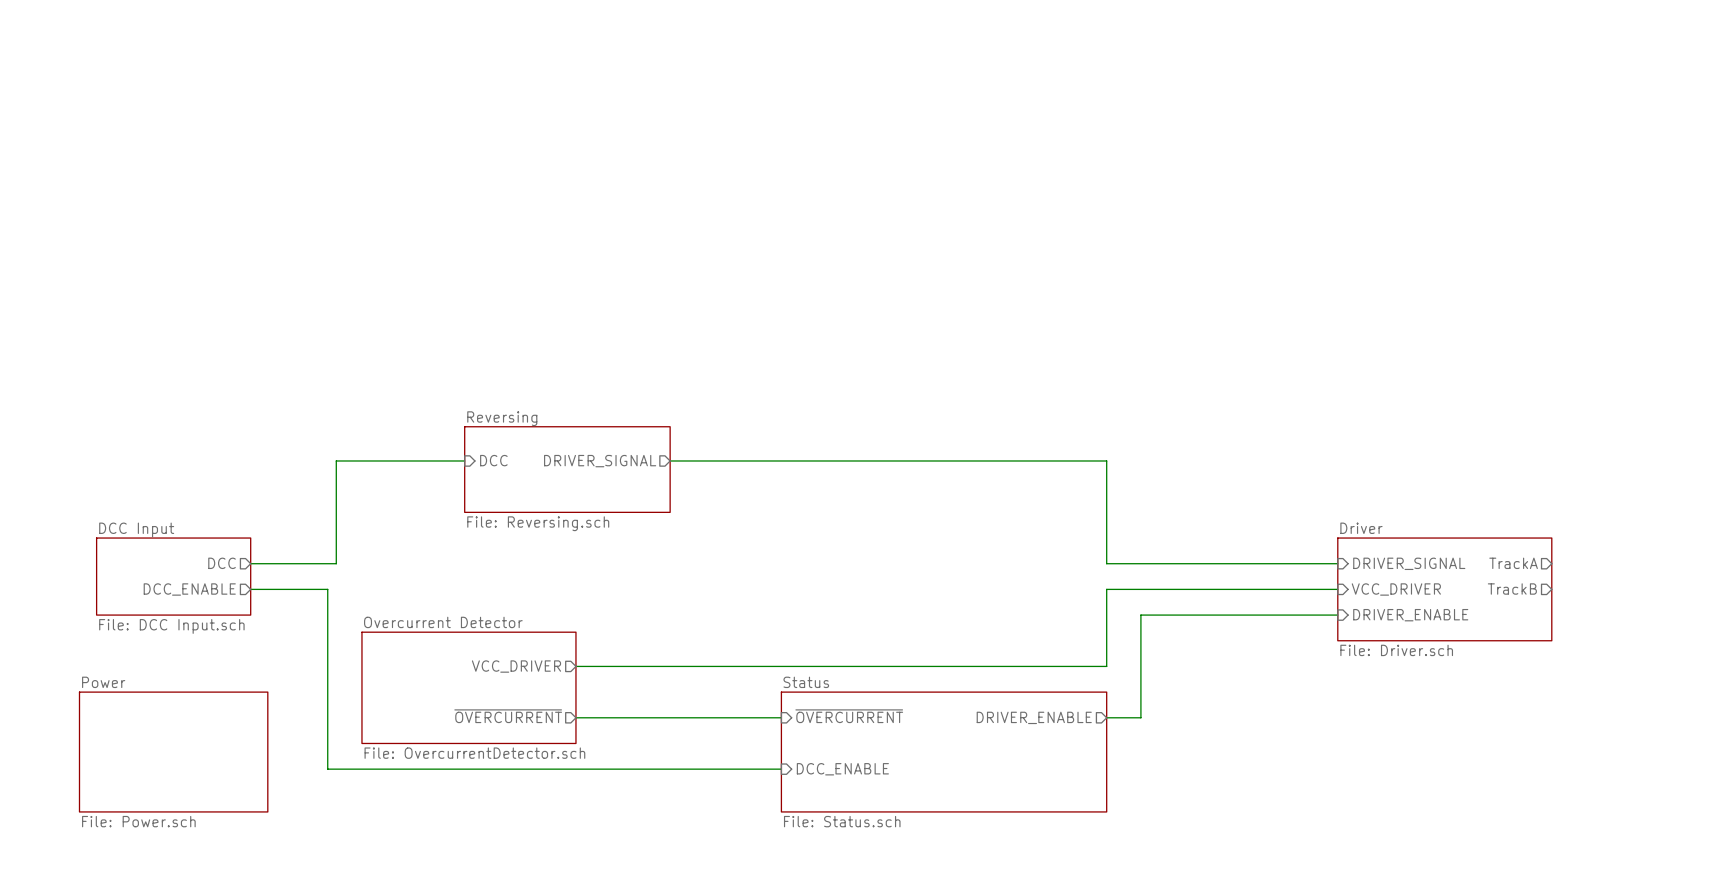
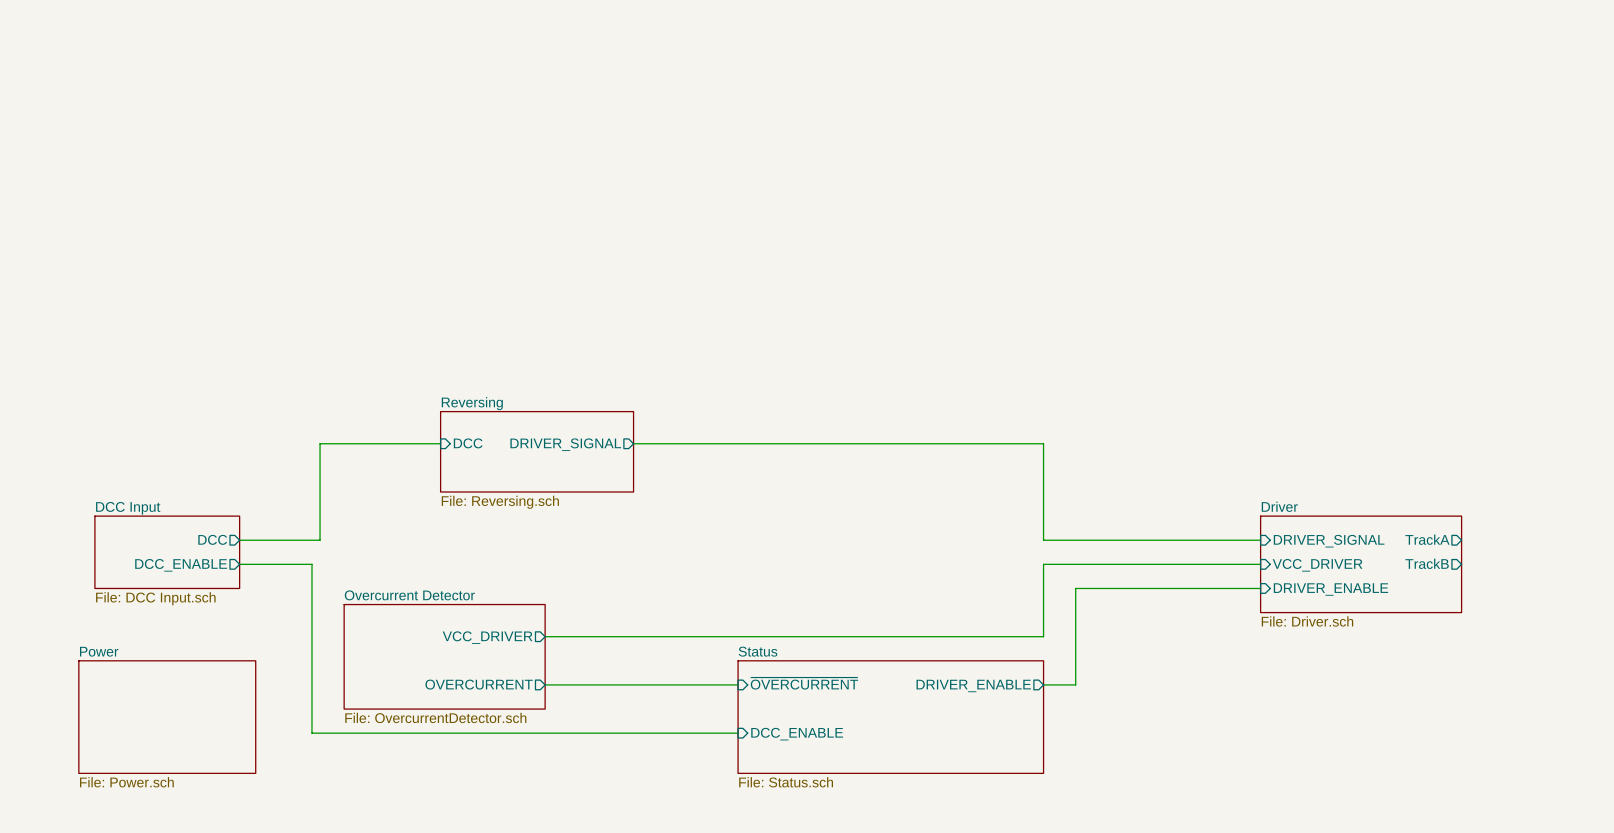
sheet pin: ~{OVERCURRENT} (508, 716) -> OVERCURRENT (479, 684)

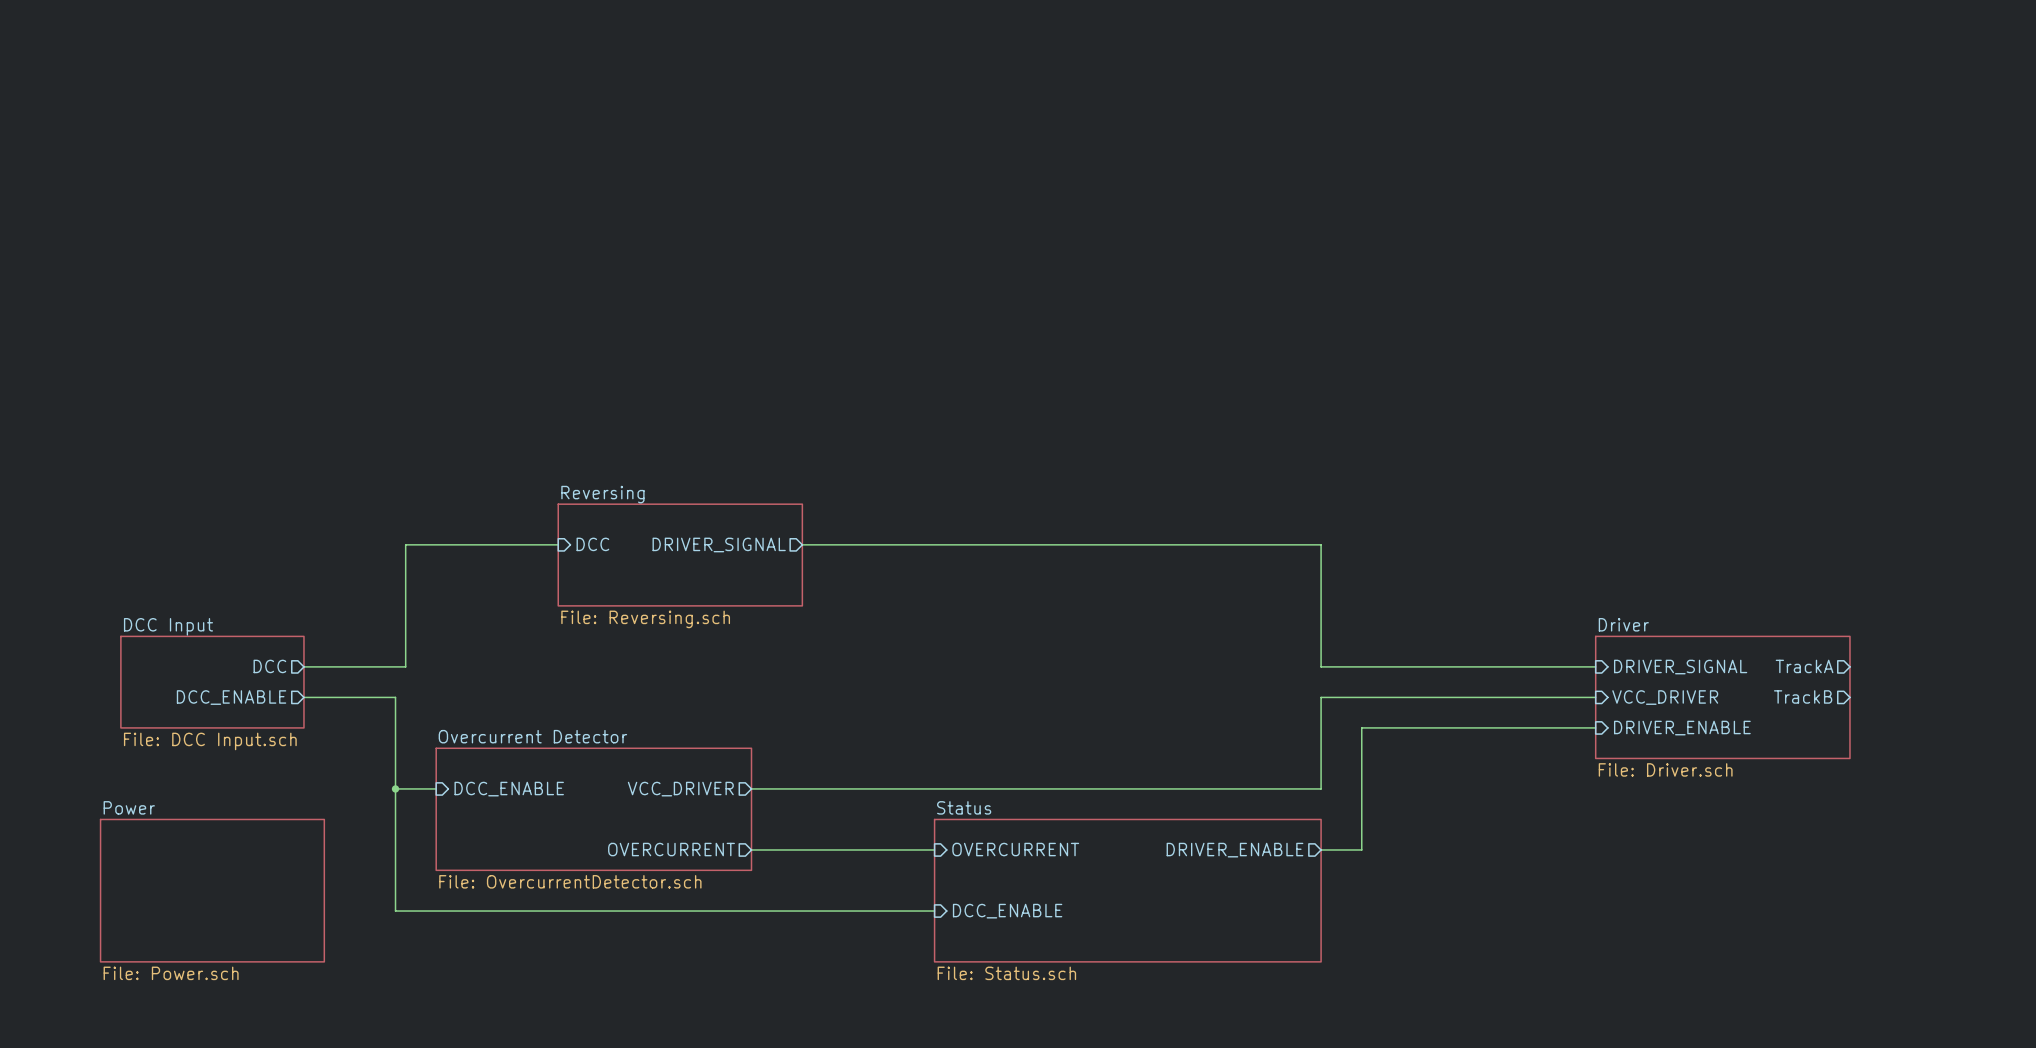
wire: none -> (395, 788) (436, 788)
junction: none -> (395, 788)
wire: (545, 636) (593, 636) -> none
sheet pin: none -> DCC_ENABLE (509, 789)
sheet pin position: VCC_DRIVER (487, 637) -> VCC_DRIVER (680, 789)
sheet Overcurrent Detector: none -> File: OvercurrentDetector.sch (593, 809)
sheet Overcurrent Detector: File: OvercurrentDetector.sch (444, 656) -> none
sheet pin: ~{OVERCURRENT} (804, 683) -> OVERCURRENT (1015, 849)
sheet pin position: OVERCURRENT (479, 684) -> OVERCURRENT (671, 849)
wire: (545, 684) (593, 684) -> none

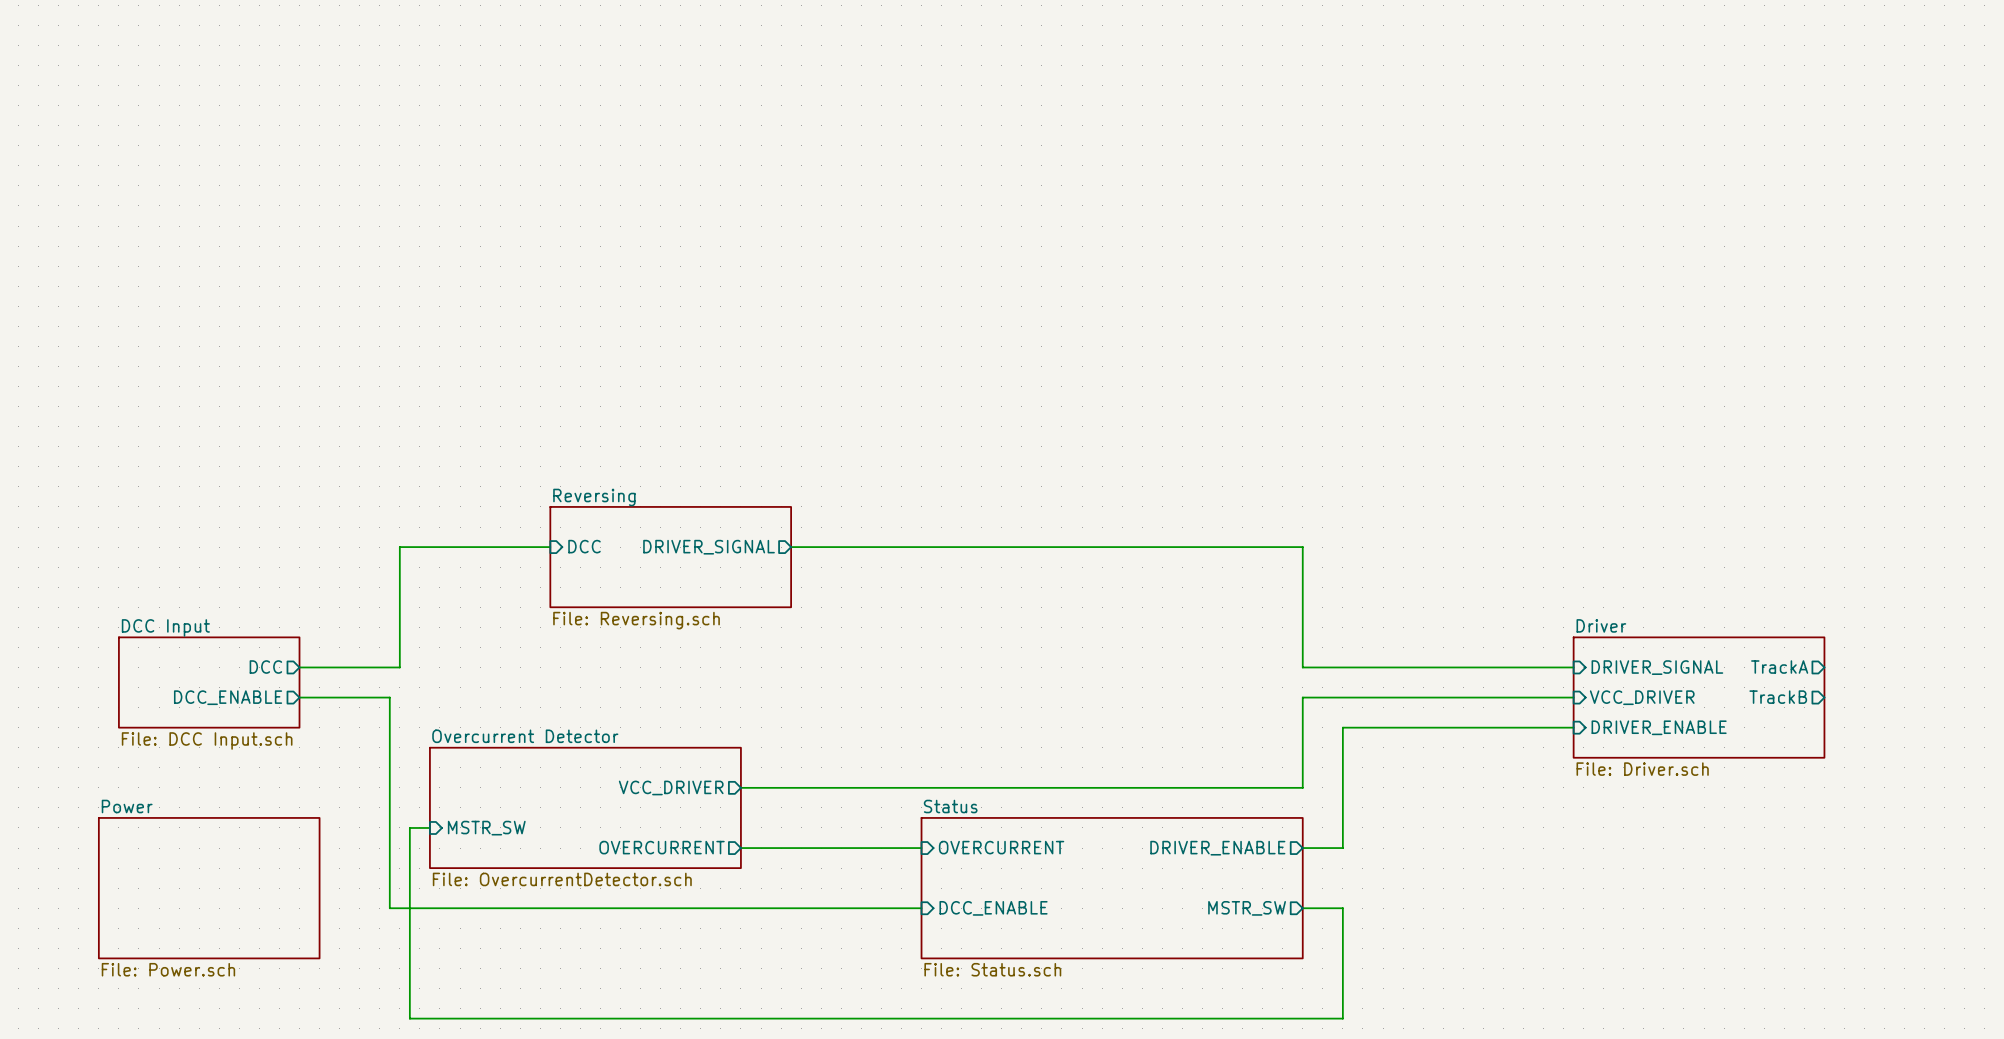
wire: (395, 788) (436, 788) -> none
junction: (395, 788) -> none
sheet pin: DCC_ENABLE (509, 789) -> none
wire: none -> (429, 827) (409, 827) (409, 1018) (1342, 1018) (1342, 908) (1302, 908)
sheet pin: none -> MSTR_SW (486, 828)
sheet pin: none -> MSTR_SW (1247, 908)

